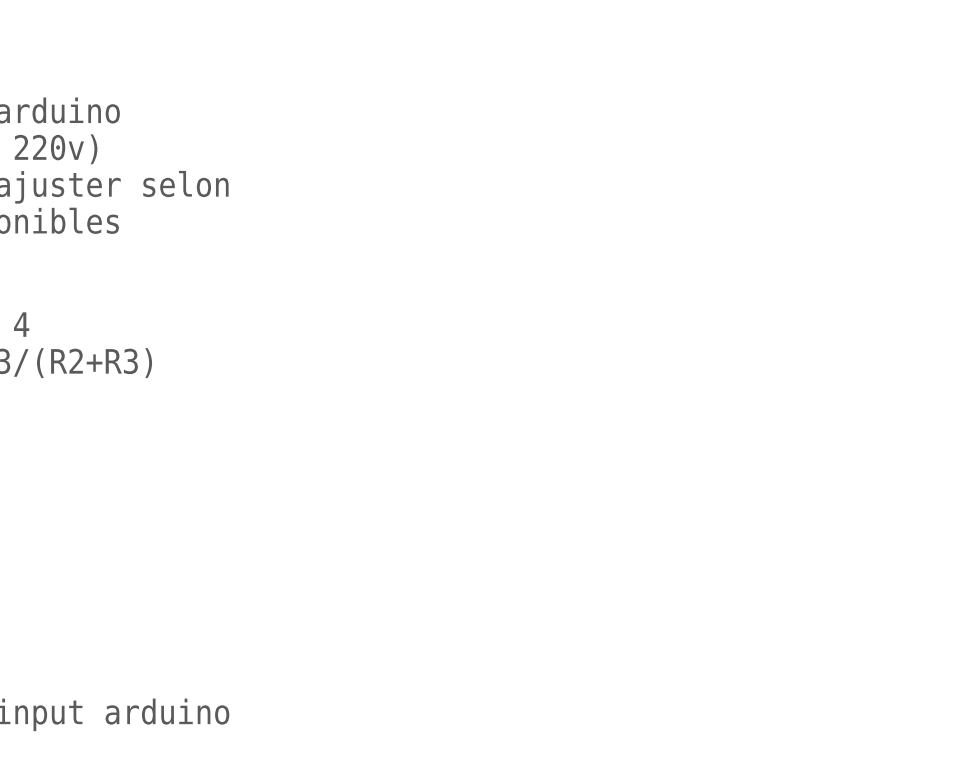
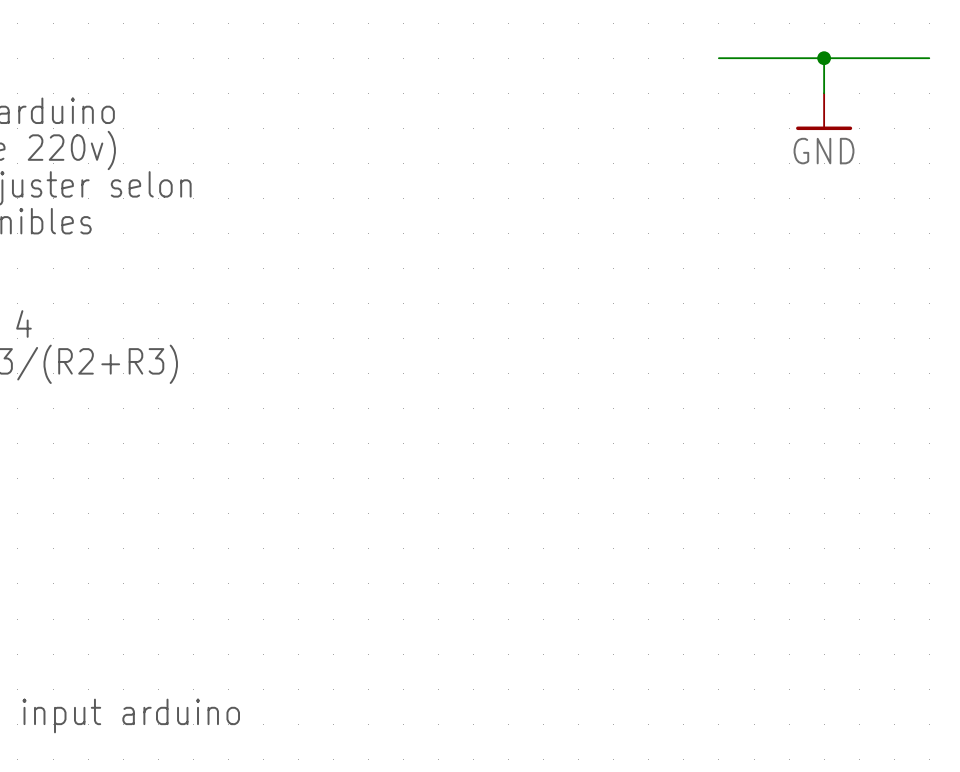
wire: none -> (718, 58) (929, 58)
wire: none -> (824, 58) (824, 93)
junction: none -> (824, 58)
power symbol: none -> GND (824, 111)

